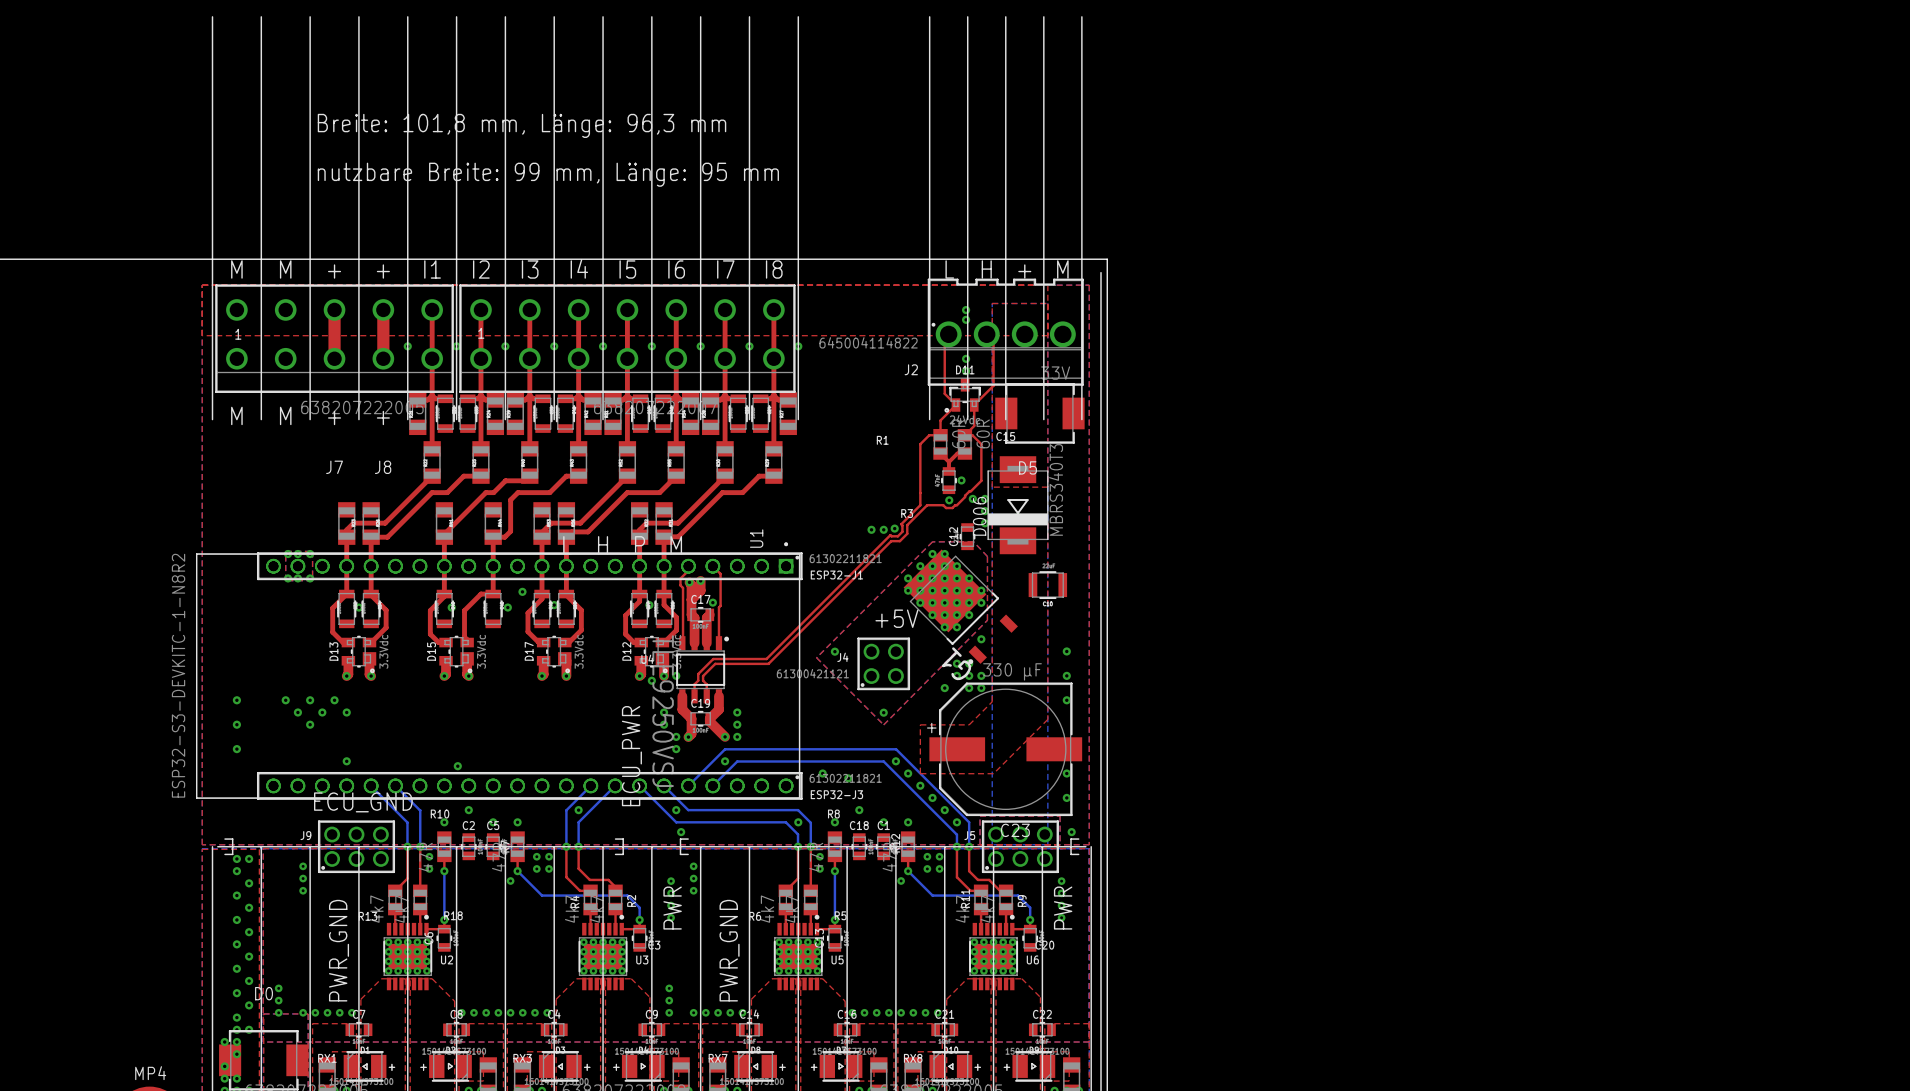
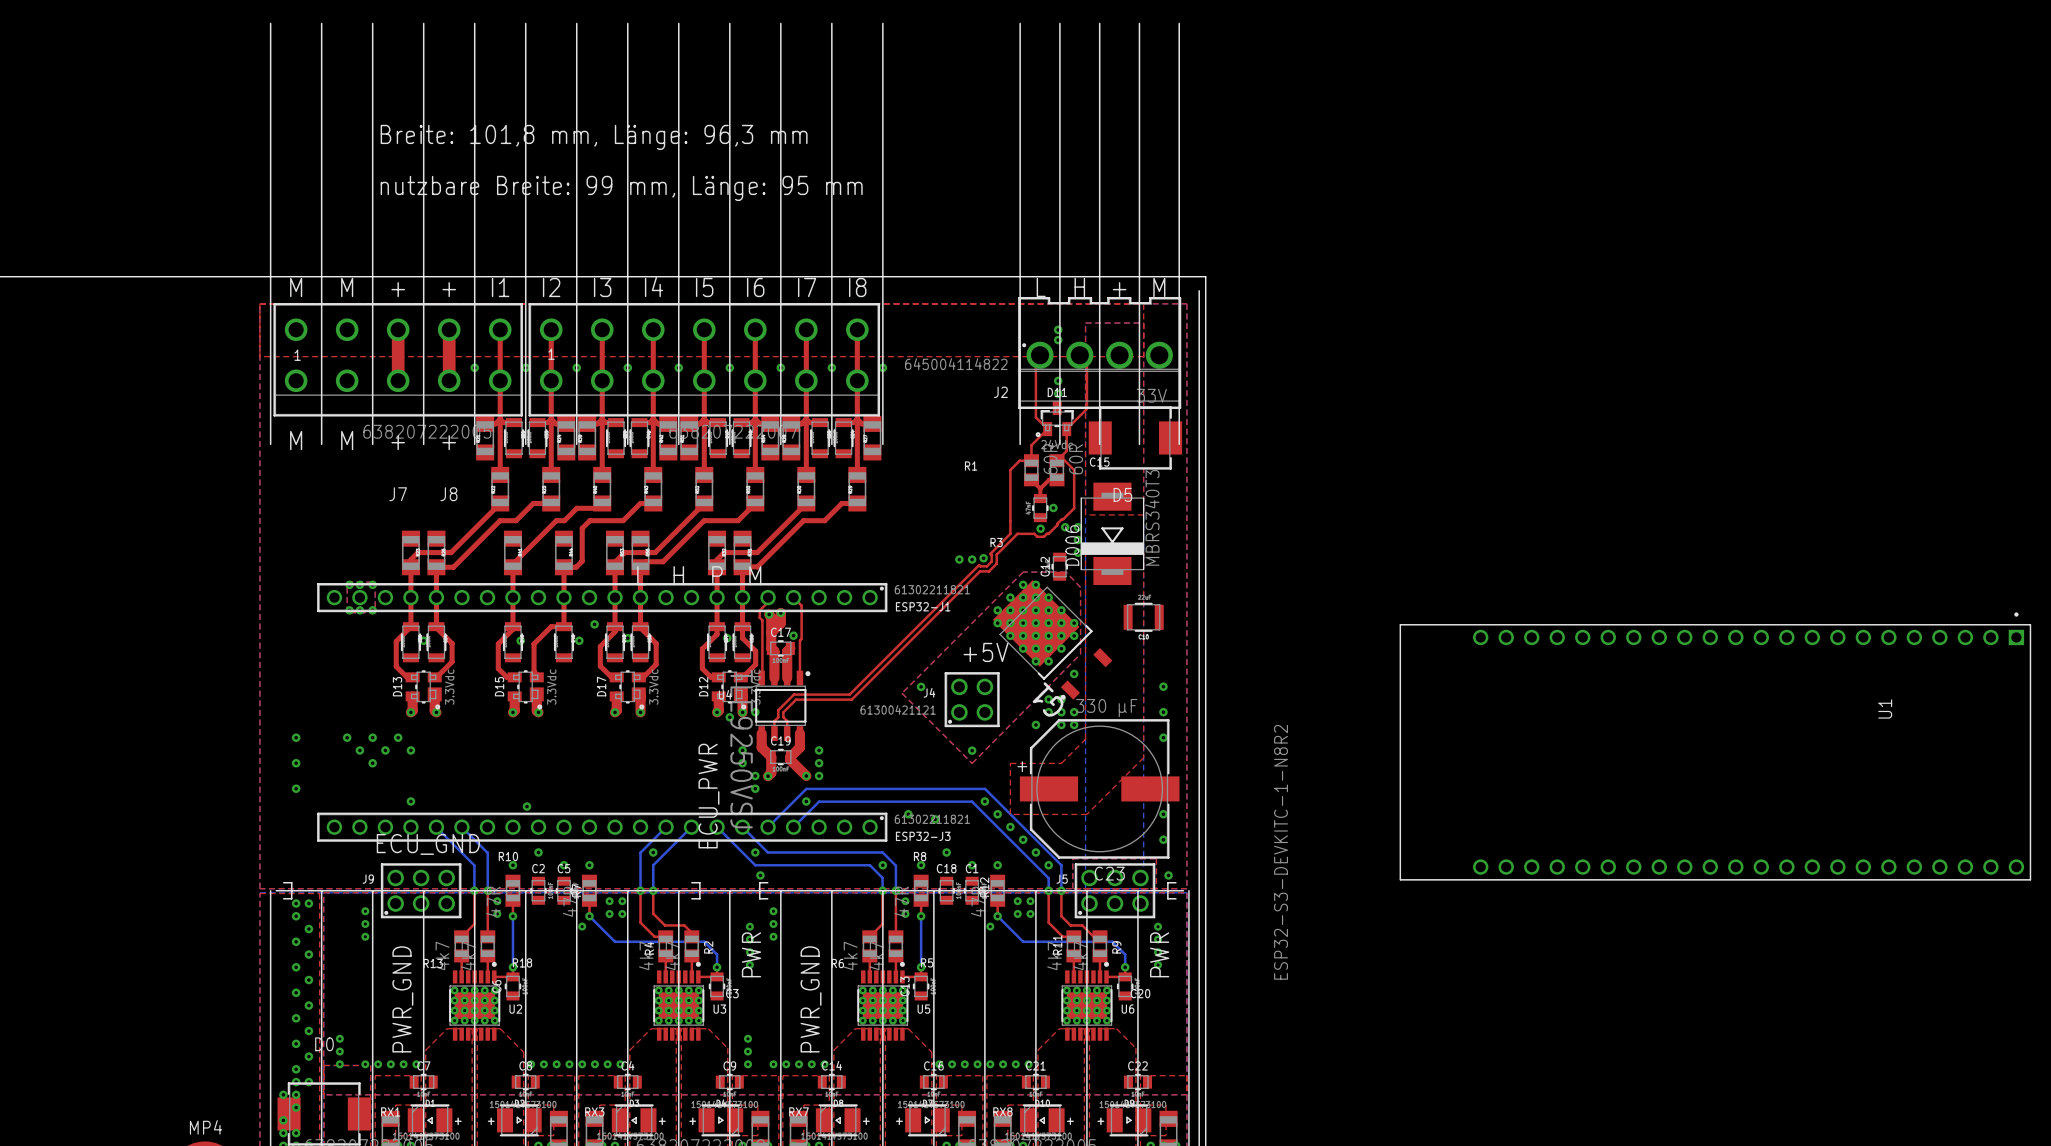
U1 name position: U1 (756, 538) -> U1 (1885, 709)
U1 position: (498, 670) -> (1715, 746)
U1 value position: ESP32-S3-DEVKITC-1-N8R2 (178, 675) -> ESP32-S3-DEVKITC-1-N8R2 (1281, 852)

